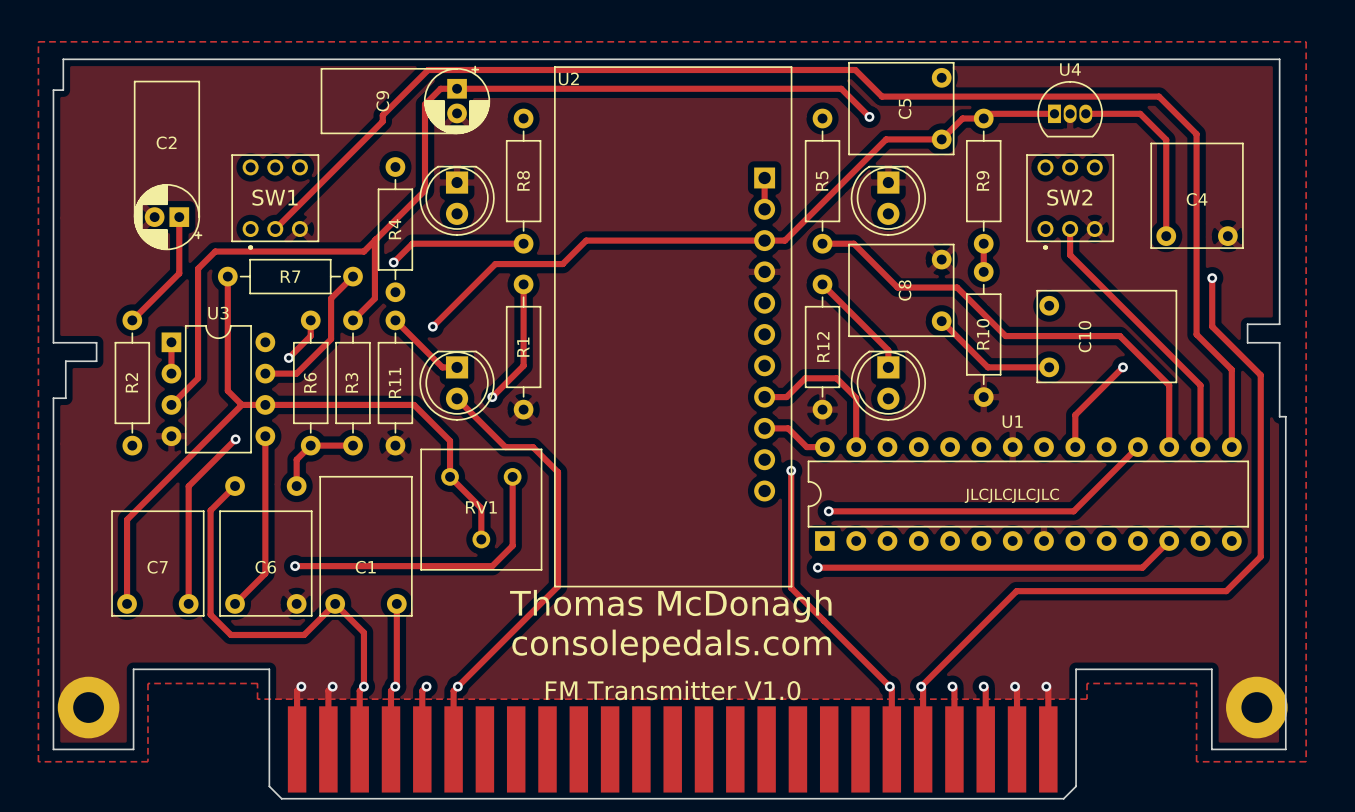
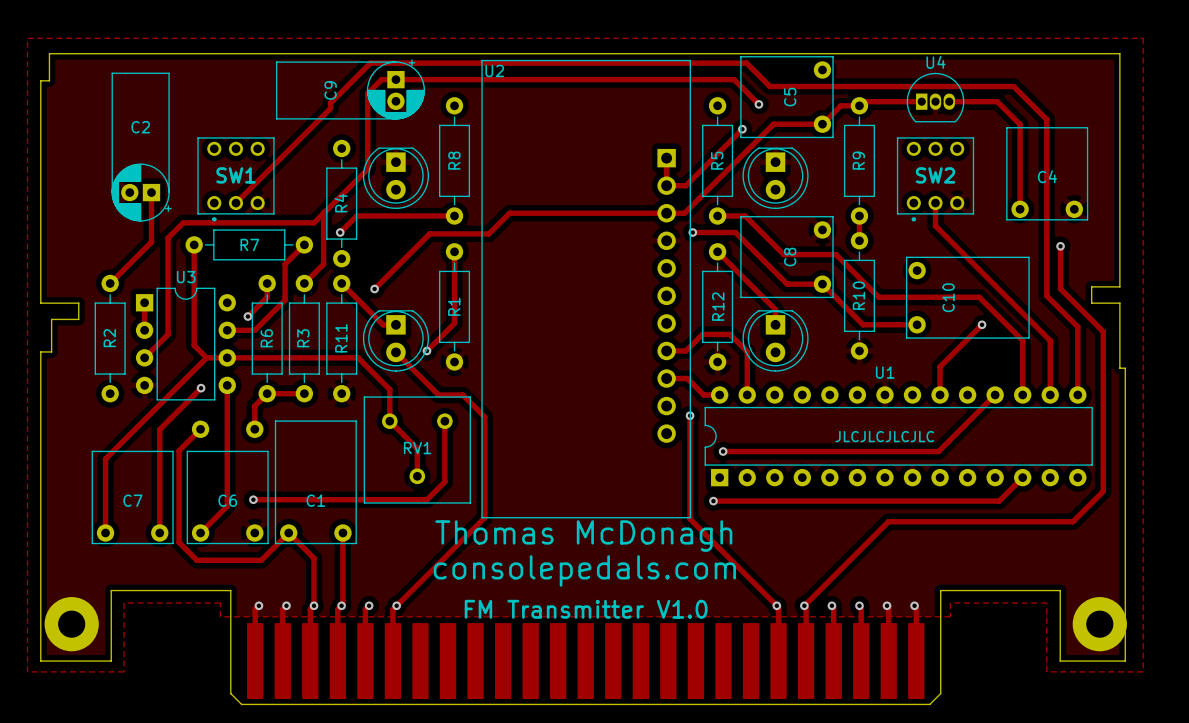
track: none -> (742, 129) (685, 185) (666, 185)
via: none -> (742, 129)
track: none -> (692, 232) (735, 232) (787, 284) (822, 284)
via: none -> (692, 232)

